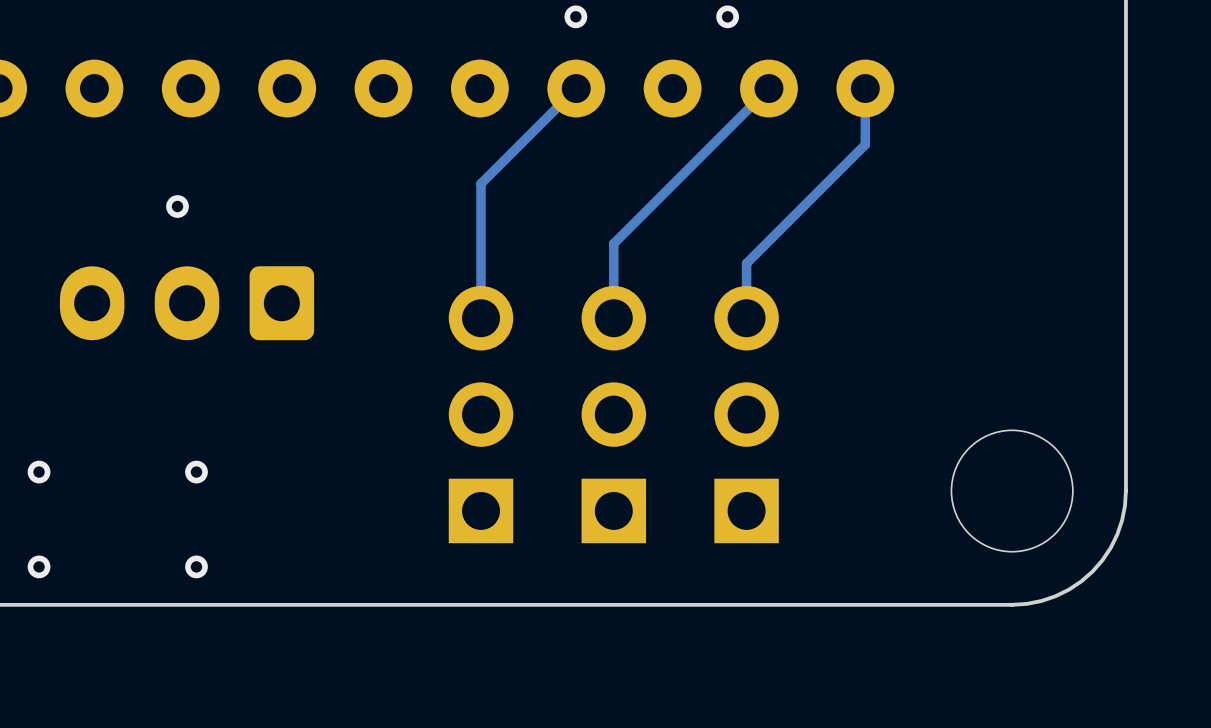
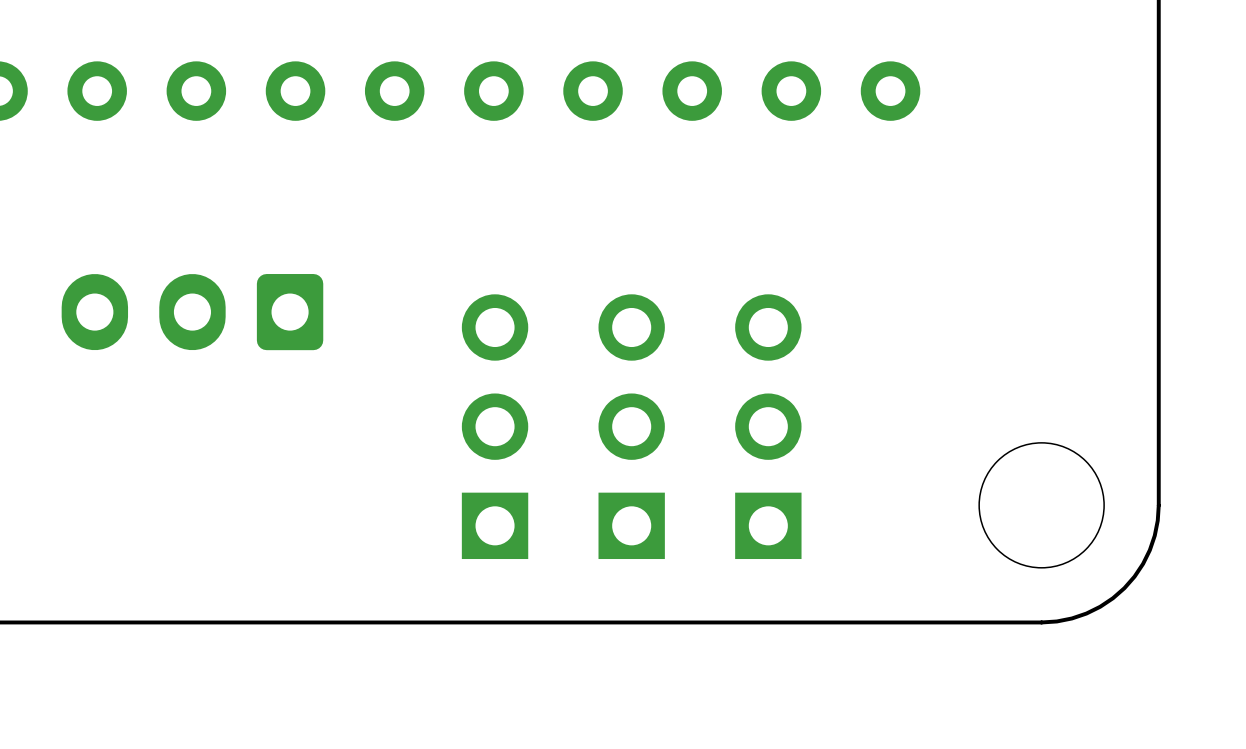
via: (575, 16) -> none
via: (727, 16) -> none
track: (576, 88) (481, 183) (481, 318) -> none
track: (768, 88) (613, 243) (613, 318) -> none
track: (865, 88) (865, 144) (746, 263) (746, 318) -> none
via: (177, 206) -> none
via: (39, 472) -> none
via: (196, 472) -> none
via: (39, 566) -> none
via: (196, 566) -> none

